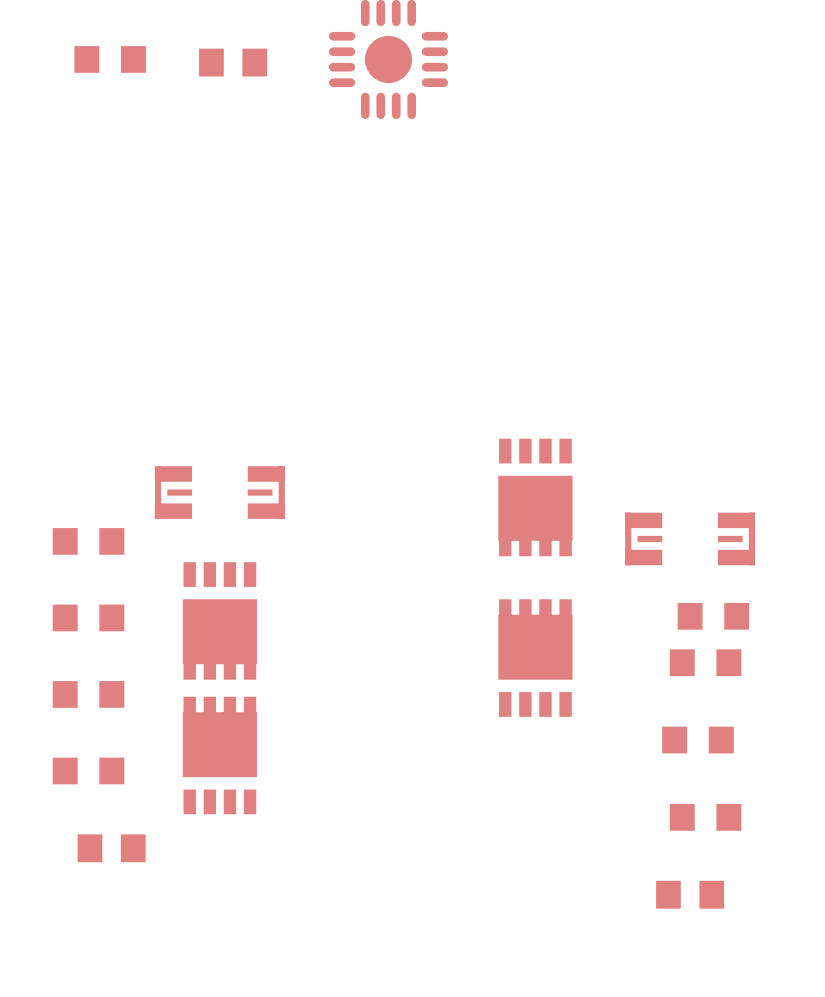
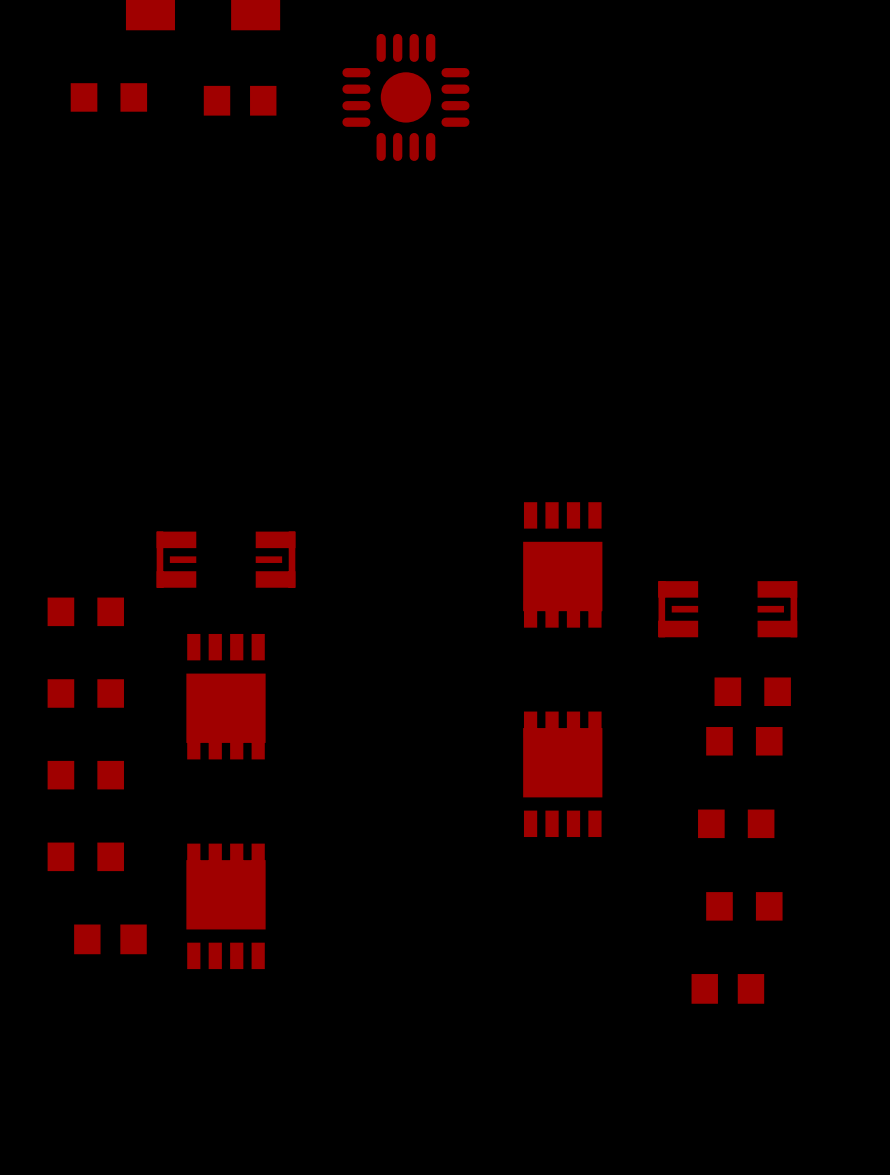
part position: (535, 658) -> (562, 774)
part position: (219, 755) -> (225, 906)

